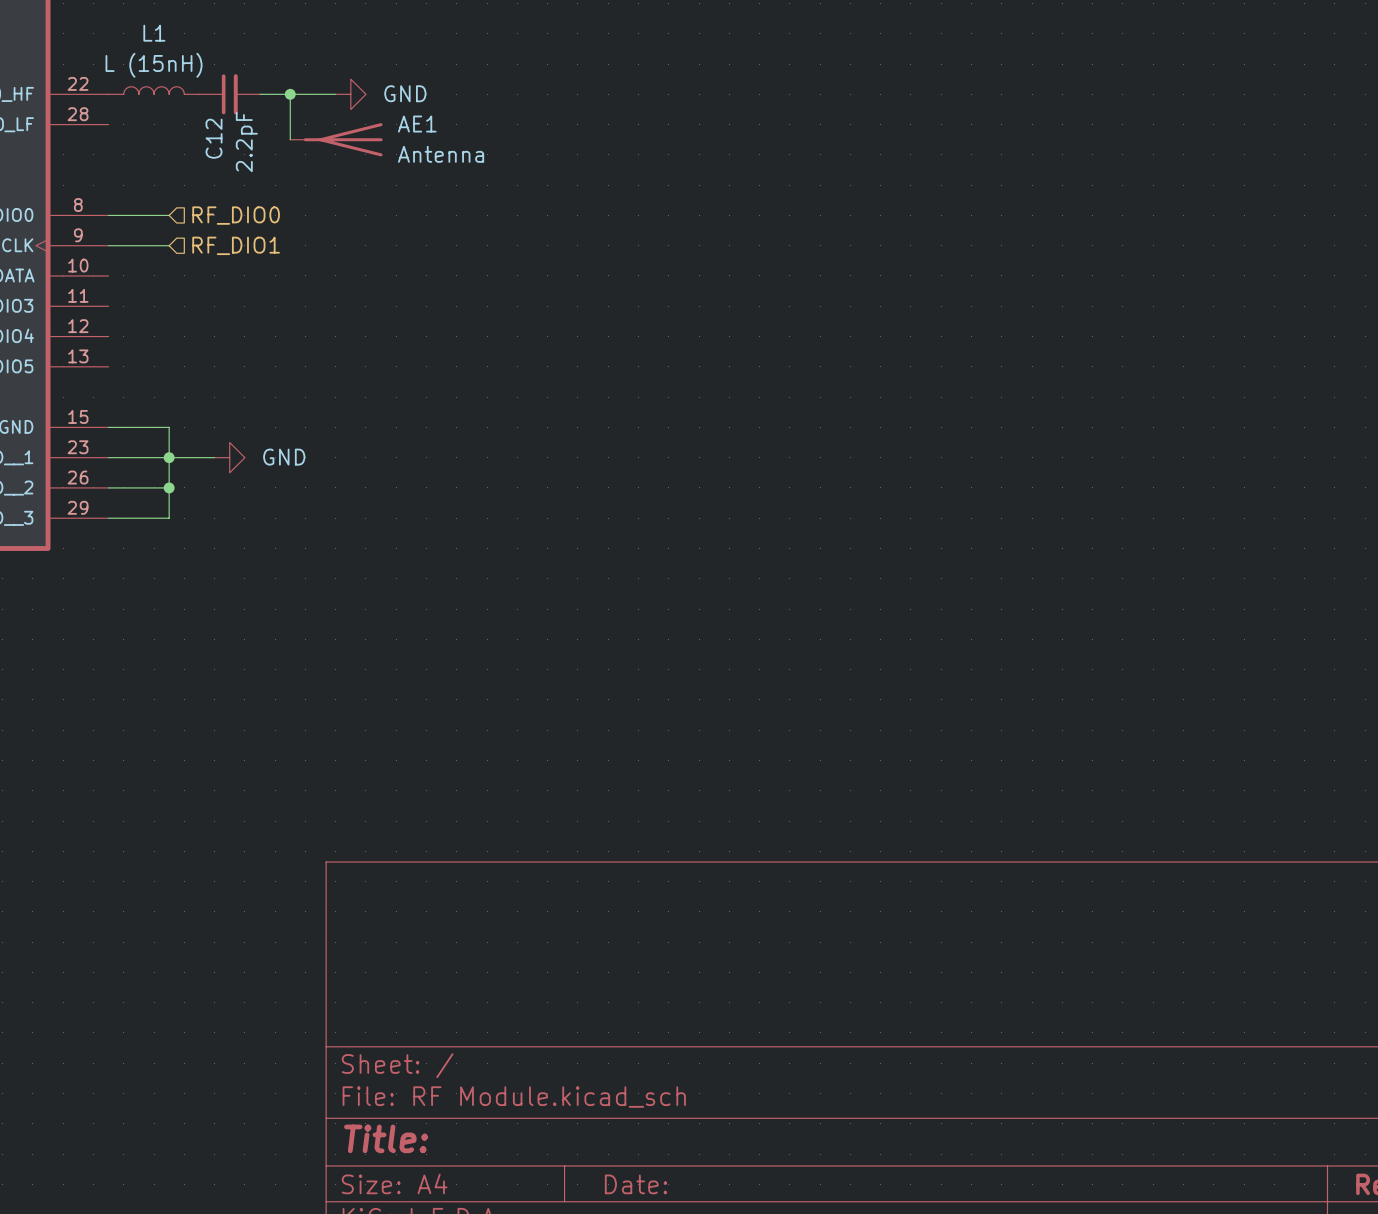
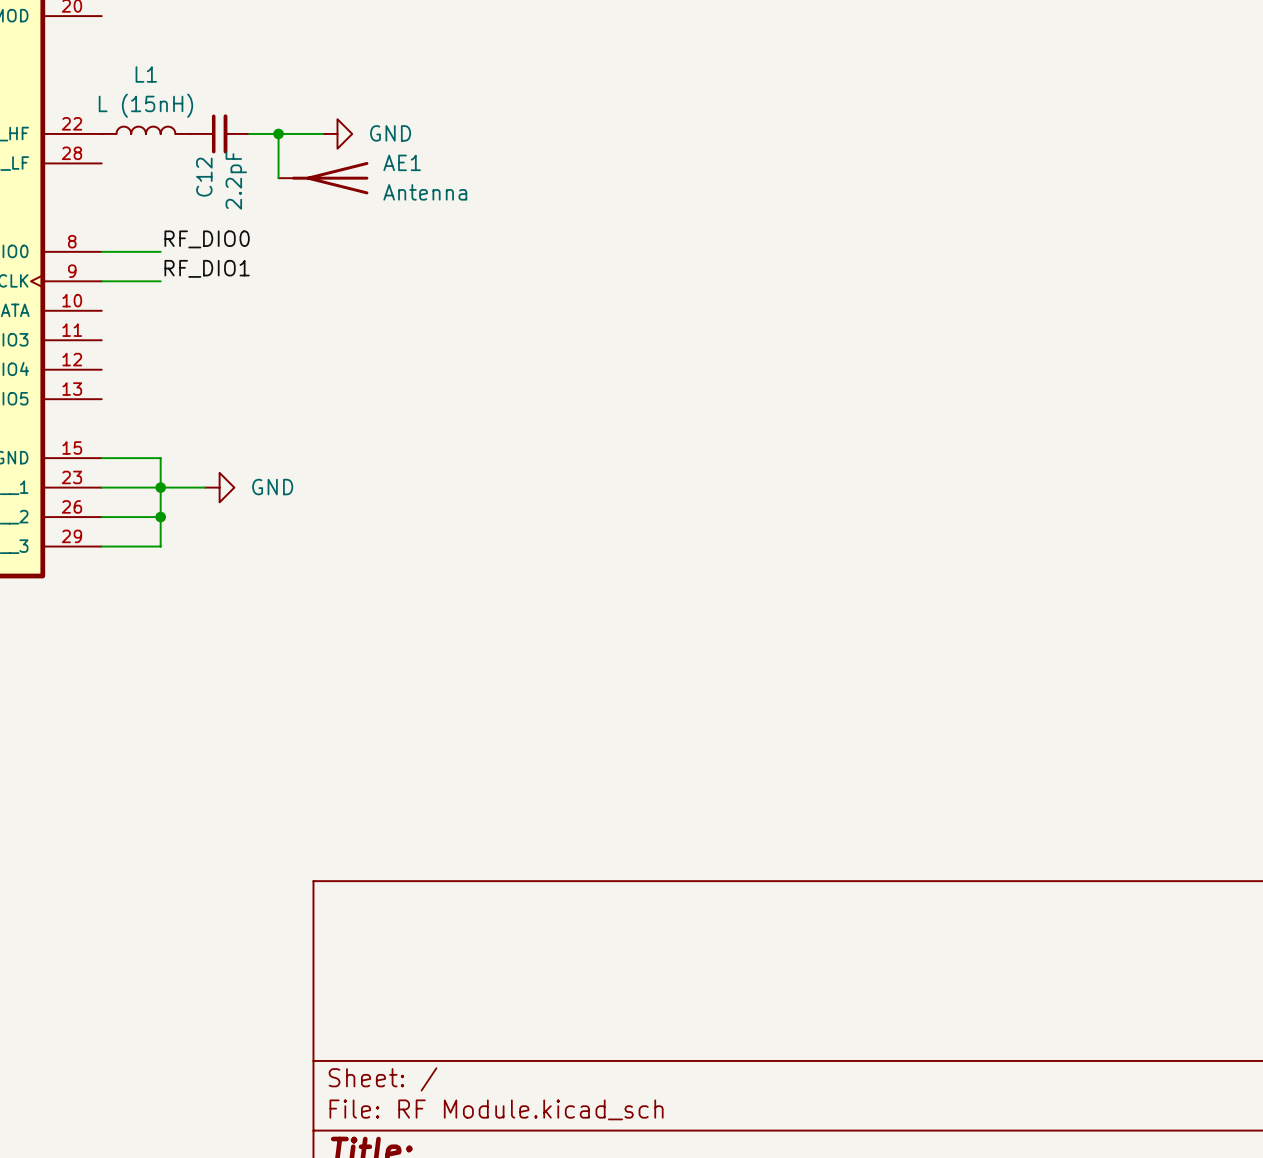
label: none -> RF_DIO0 (207, 239)
hierarchical label: RF_DIO0 (236, 215) -> none
label: none -> RF_DIO1 (207, 268)
hierarchical label: RF_DIO1 (236, 245) -> none

